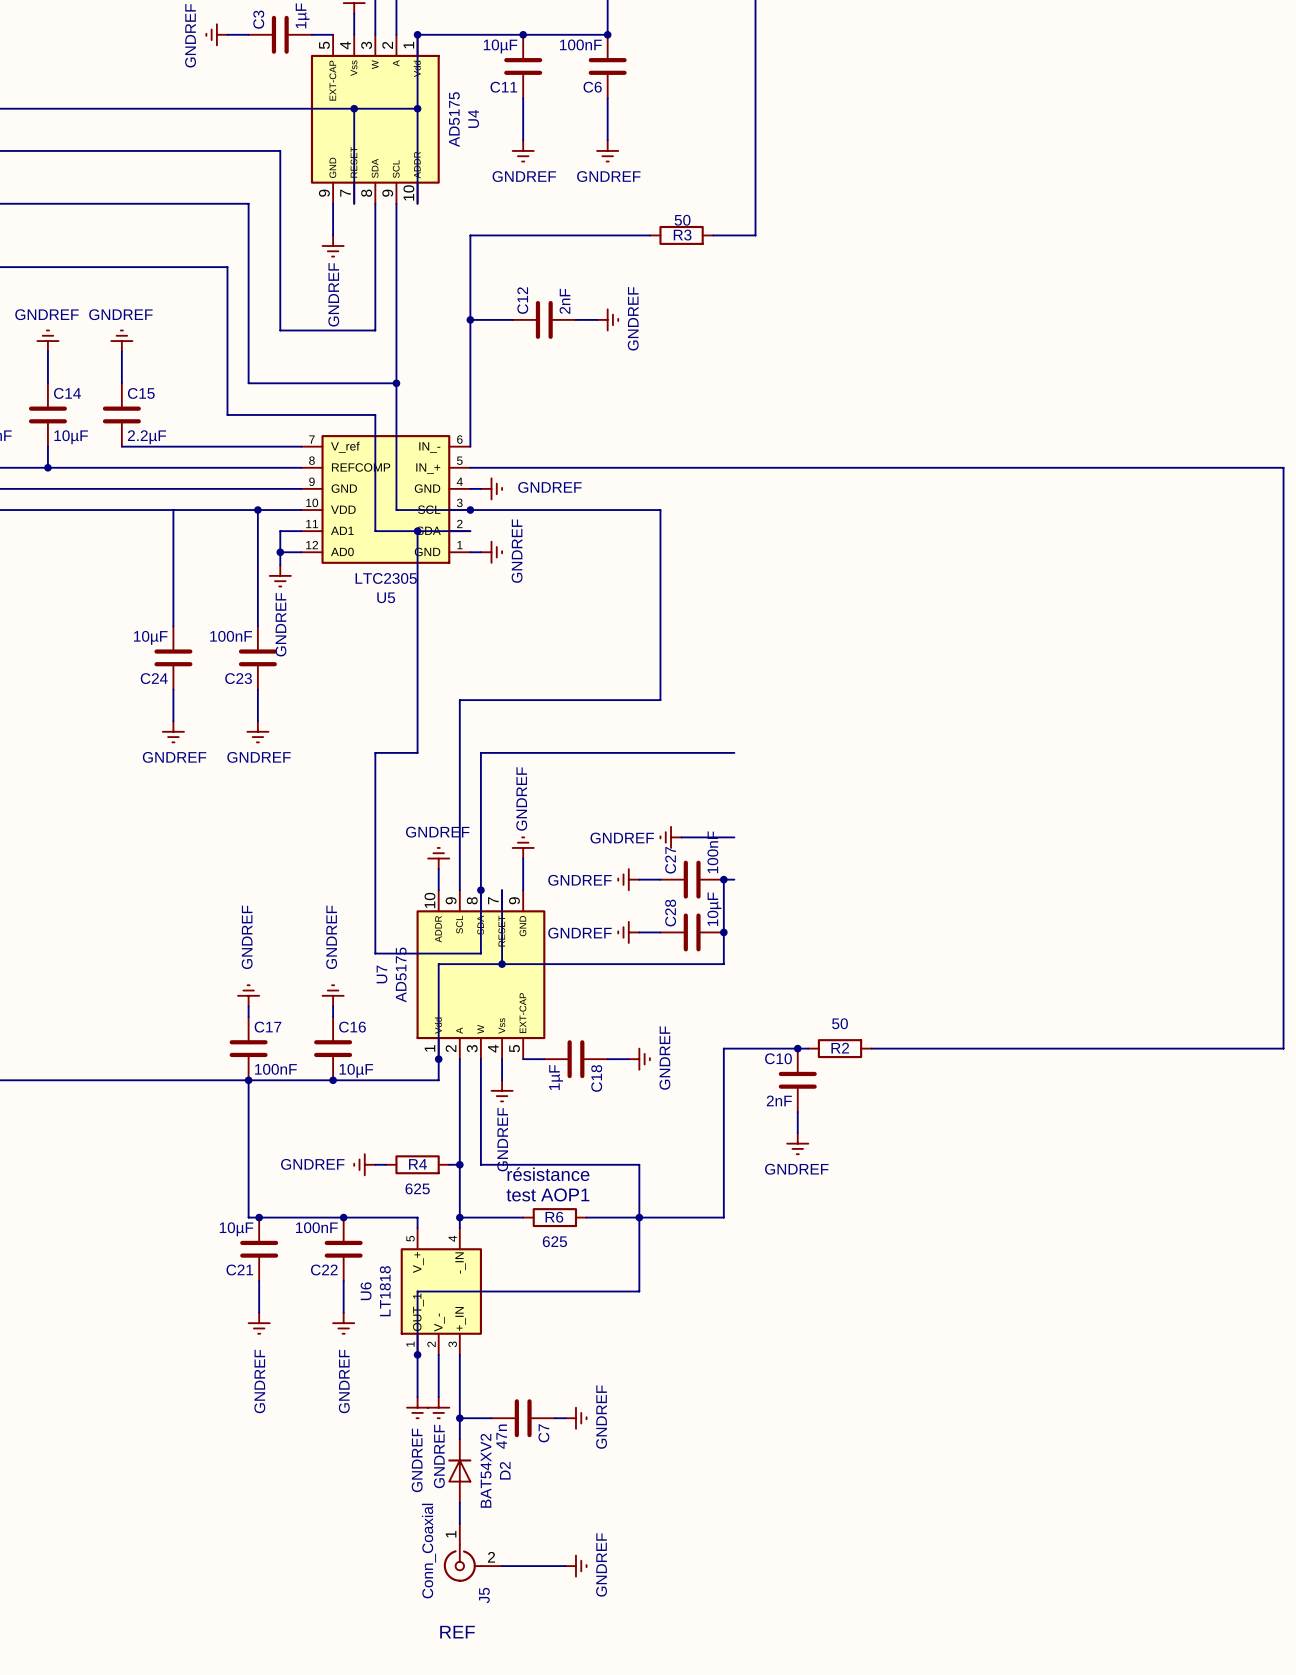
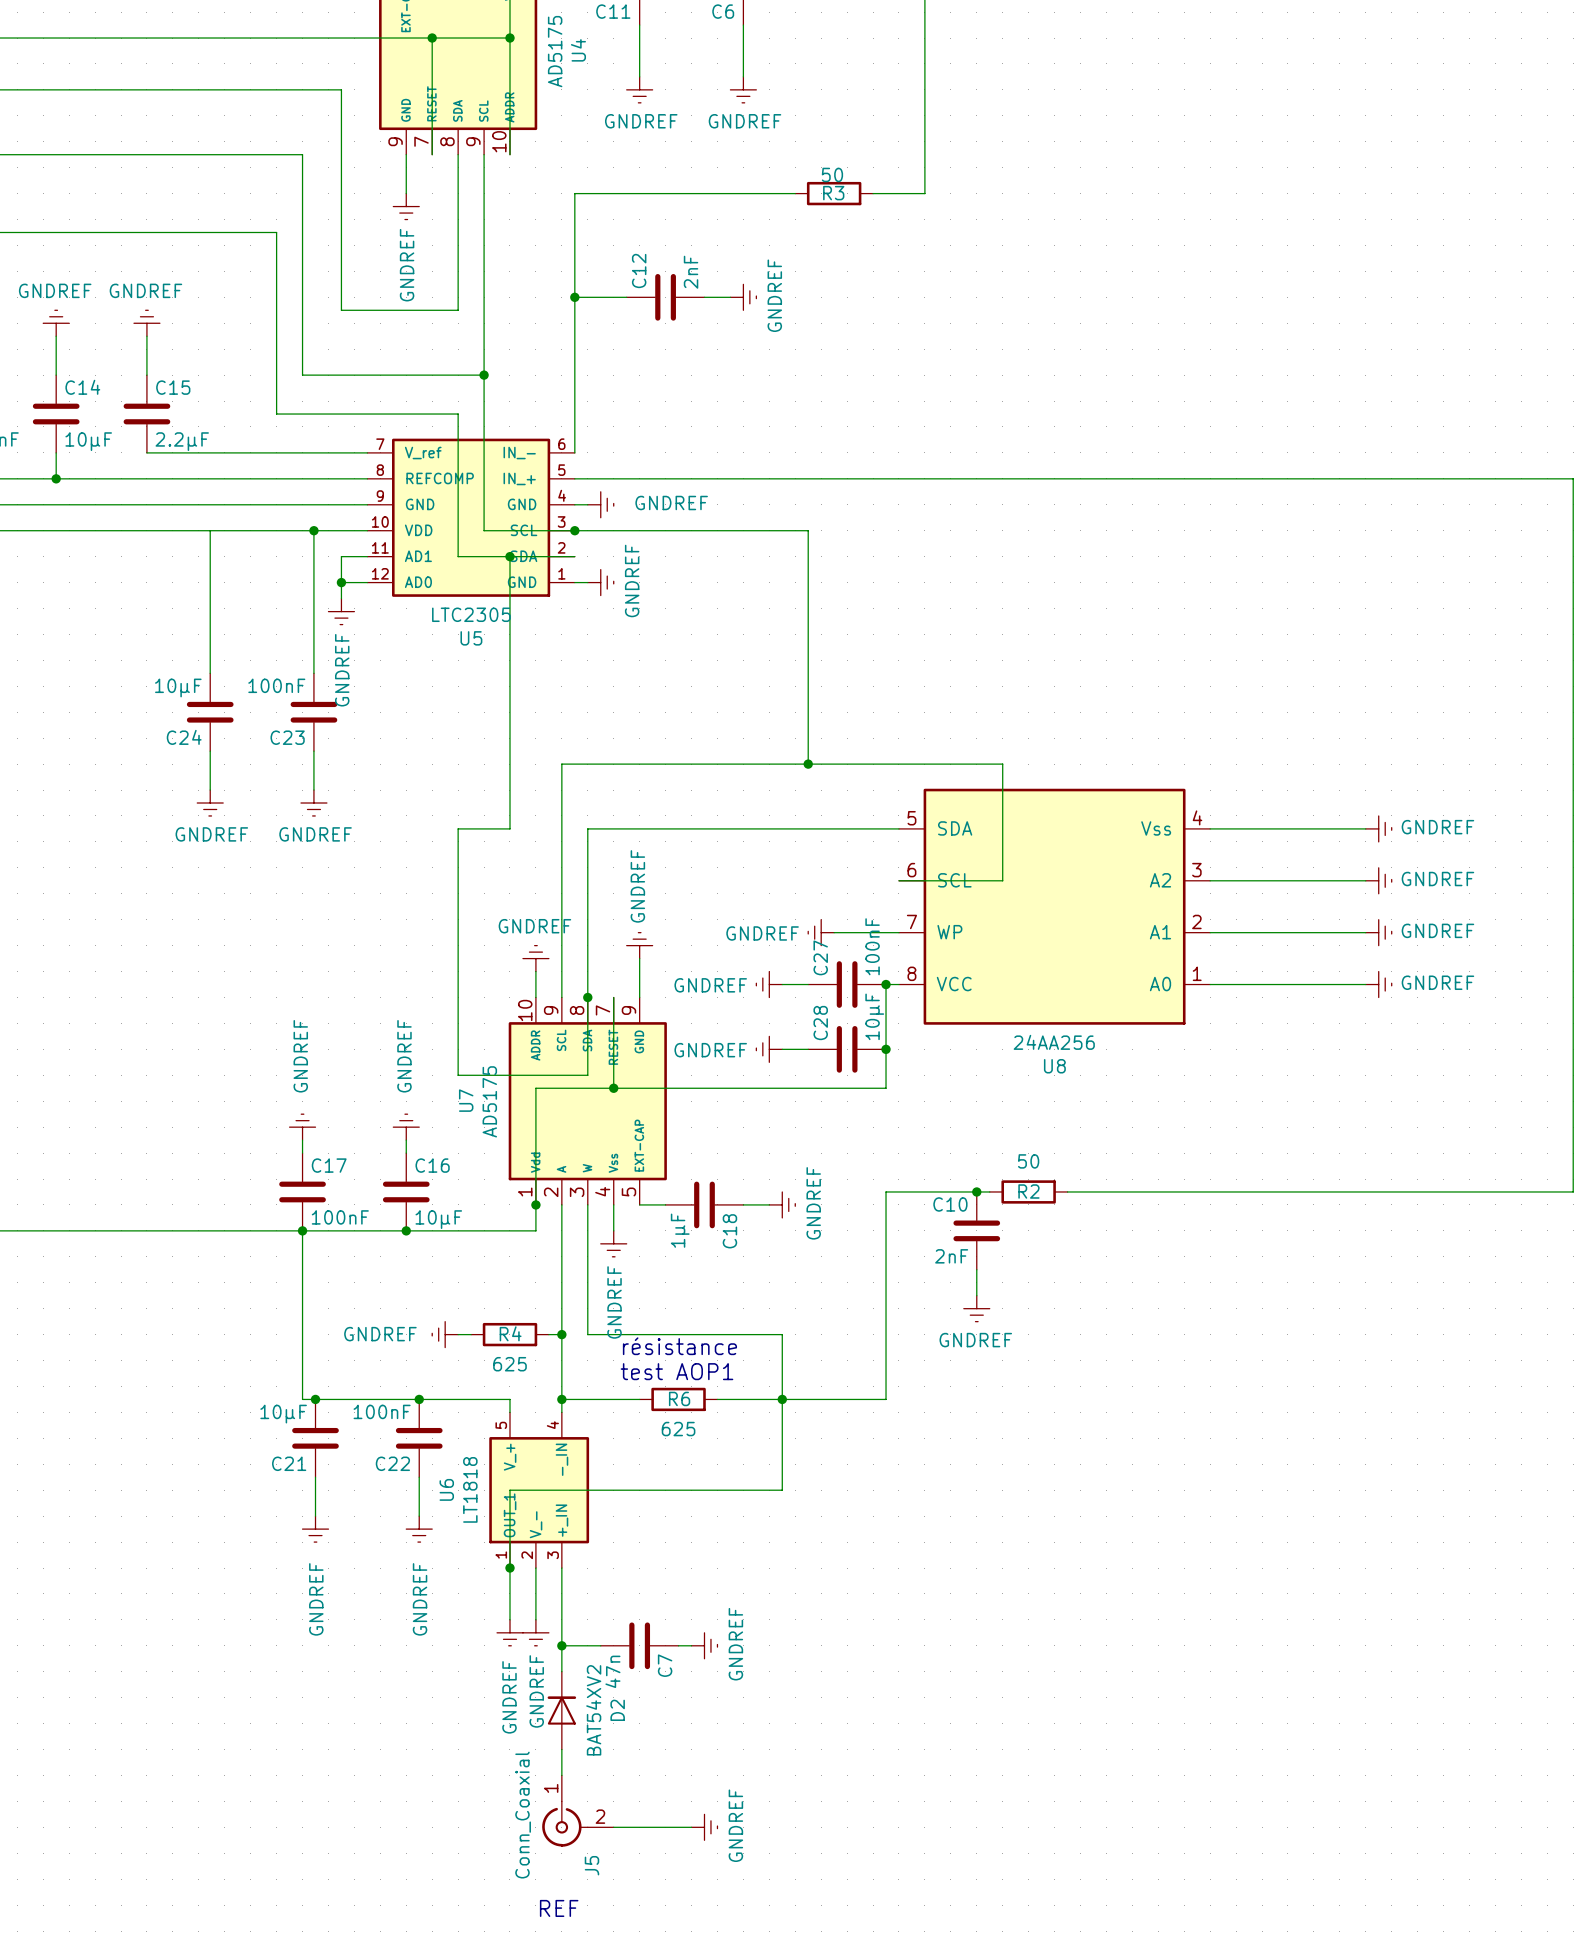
wire: none -> (808, 764) (1002, 764) (1002, 880) (898, 880)
junction: none -> (808, 764)
wire: none -> (1210, 828) (1365, 828)
power symbol: none -> GNDREF (1378, 828)
wire: none -> (1210, 880) (1365, 880)
power symbol: none -> GNDREF (1378, 880)
U8: none -> 24AA256 (1054, 906)
wire: none -> (1210, 932) (1365, 932)
power symbol: none -> GNDREF (1378, 932)
wire: none -> (1210, 984) (1365, 984)
power symbol: none -> GNDREF (1378, 984)

